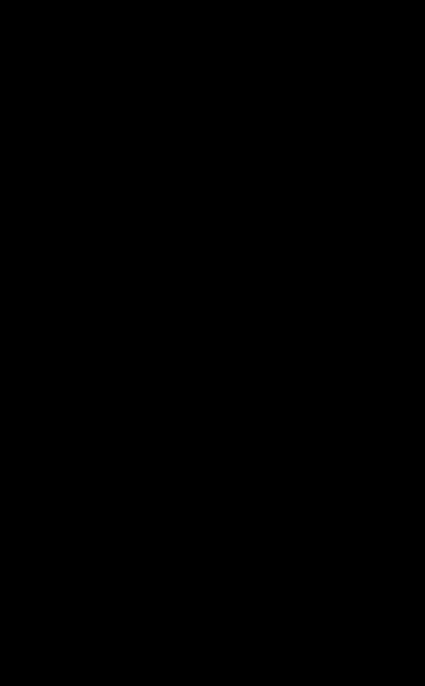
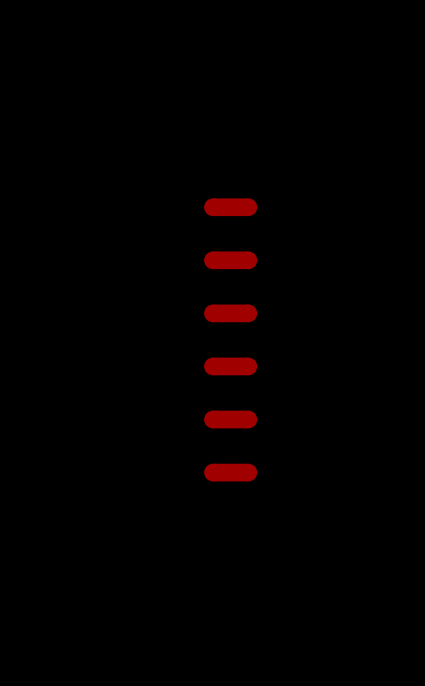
part: none -> (230, 207)
part: none -> (230, 260)
part: none -> (230, 313)
part: none -> (230, 366)
part: none -> (230, 419)
part: none -> (230, 472)

